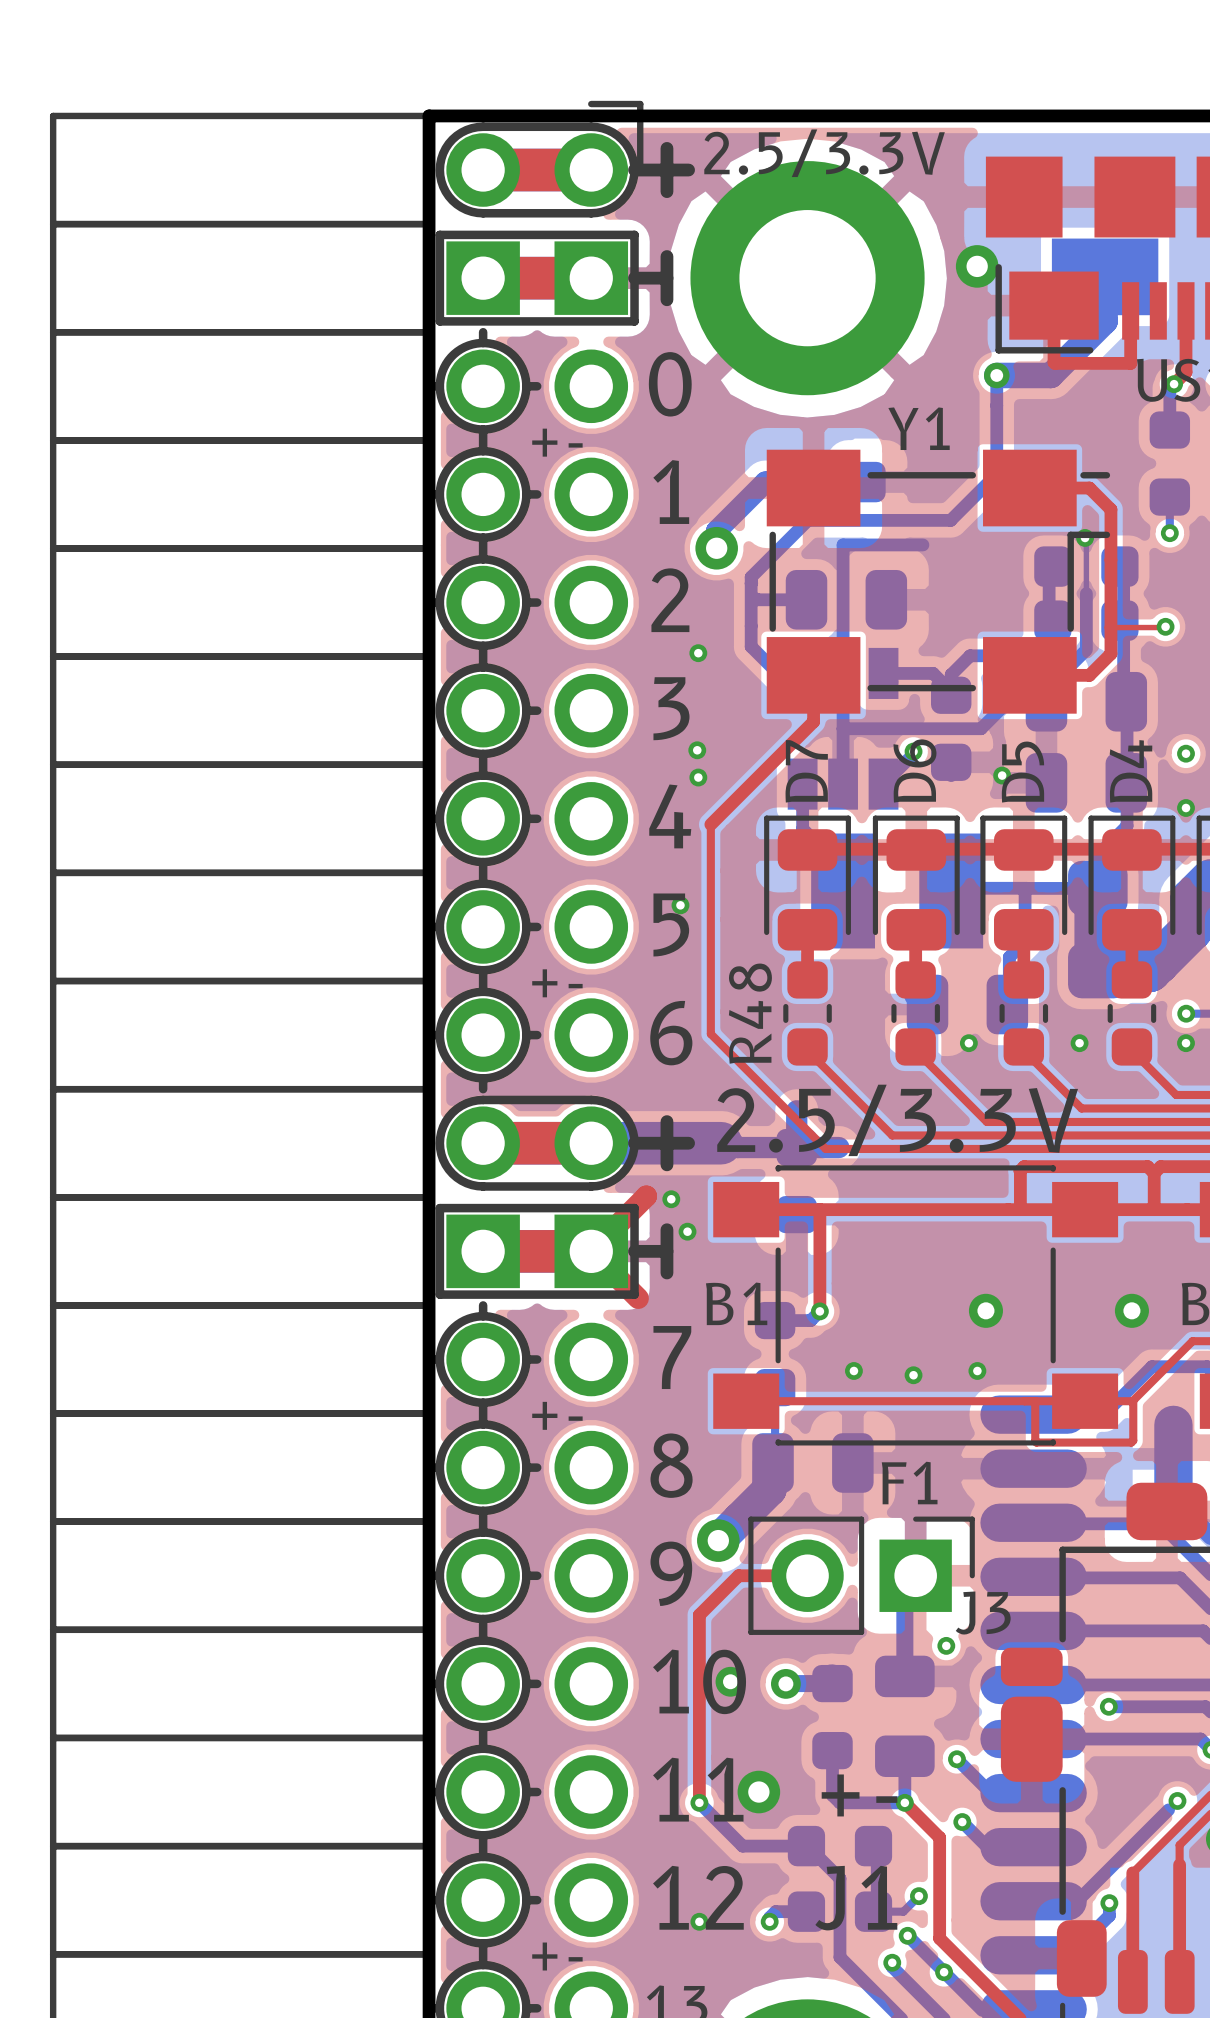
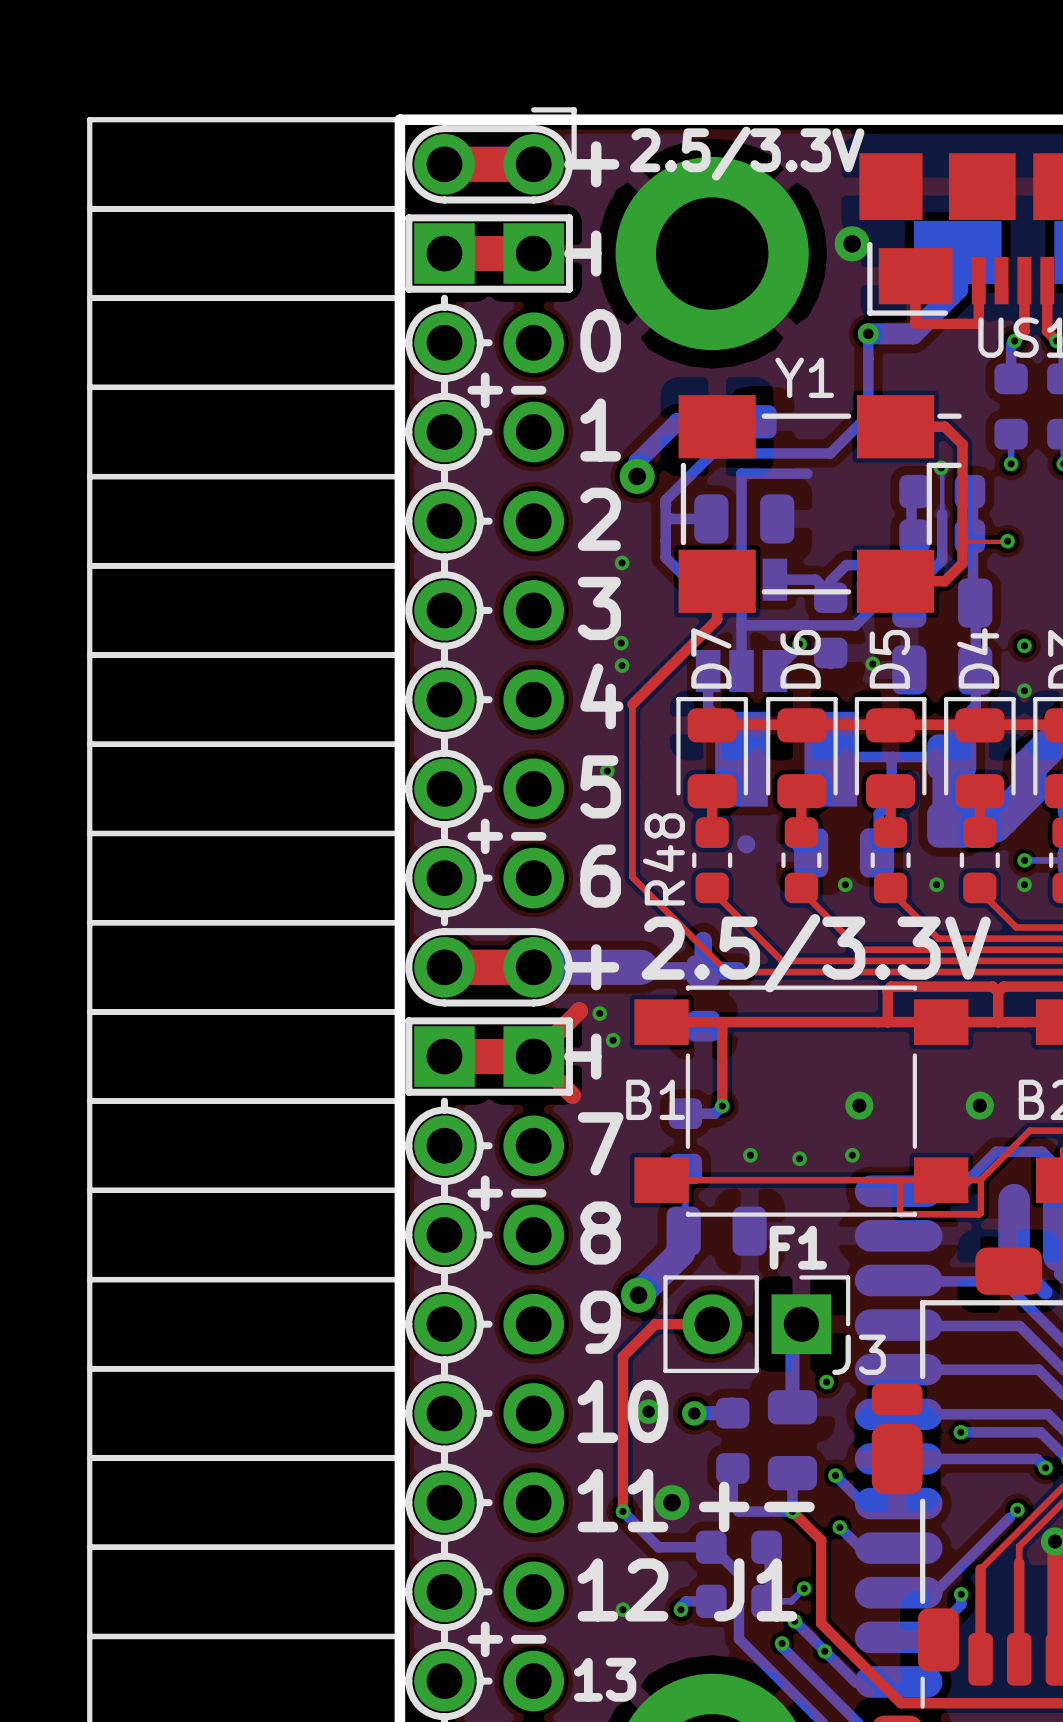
bottom track: none -> (745, 843) (746, 844)

